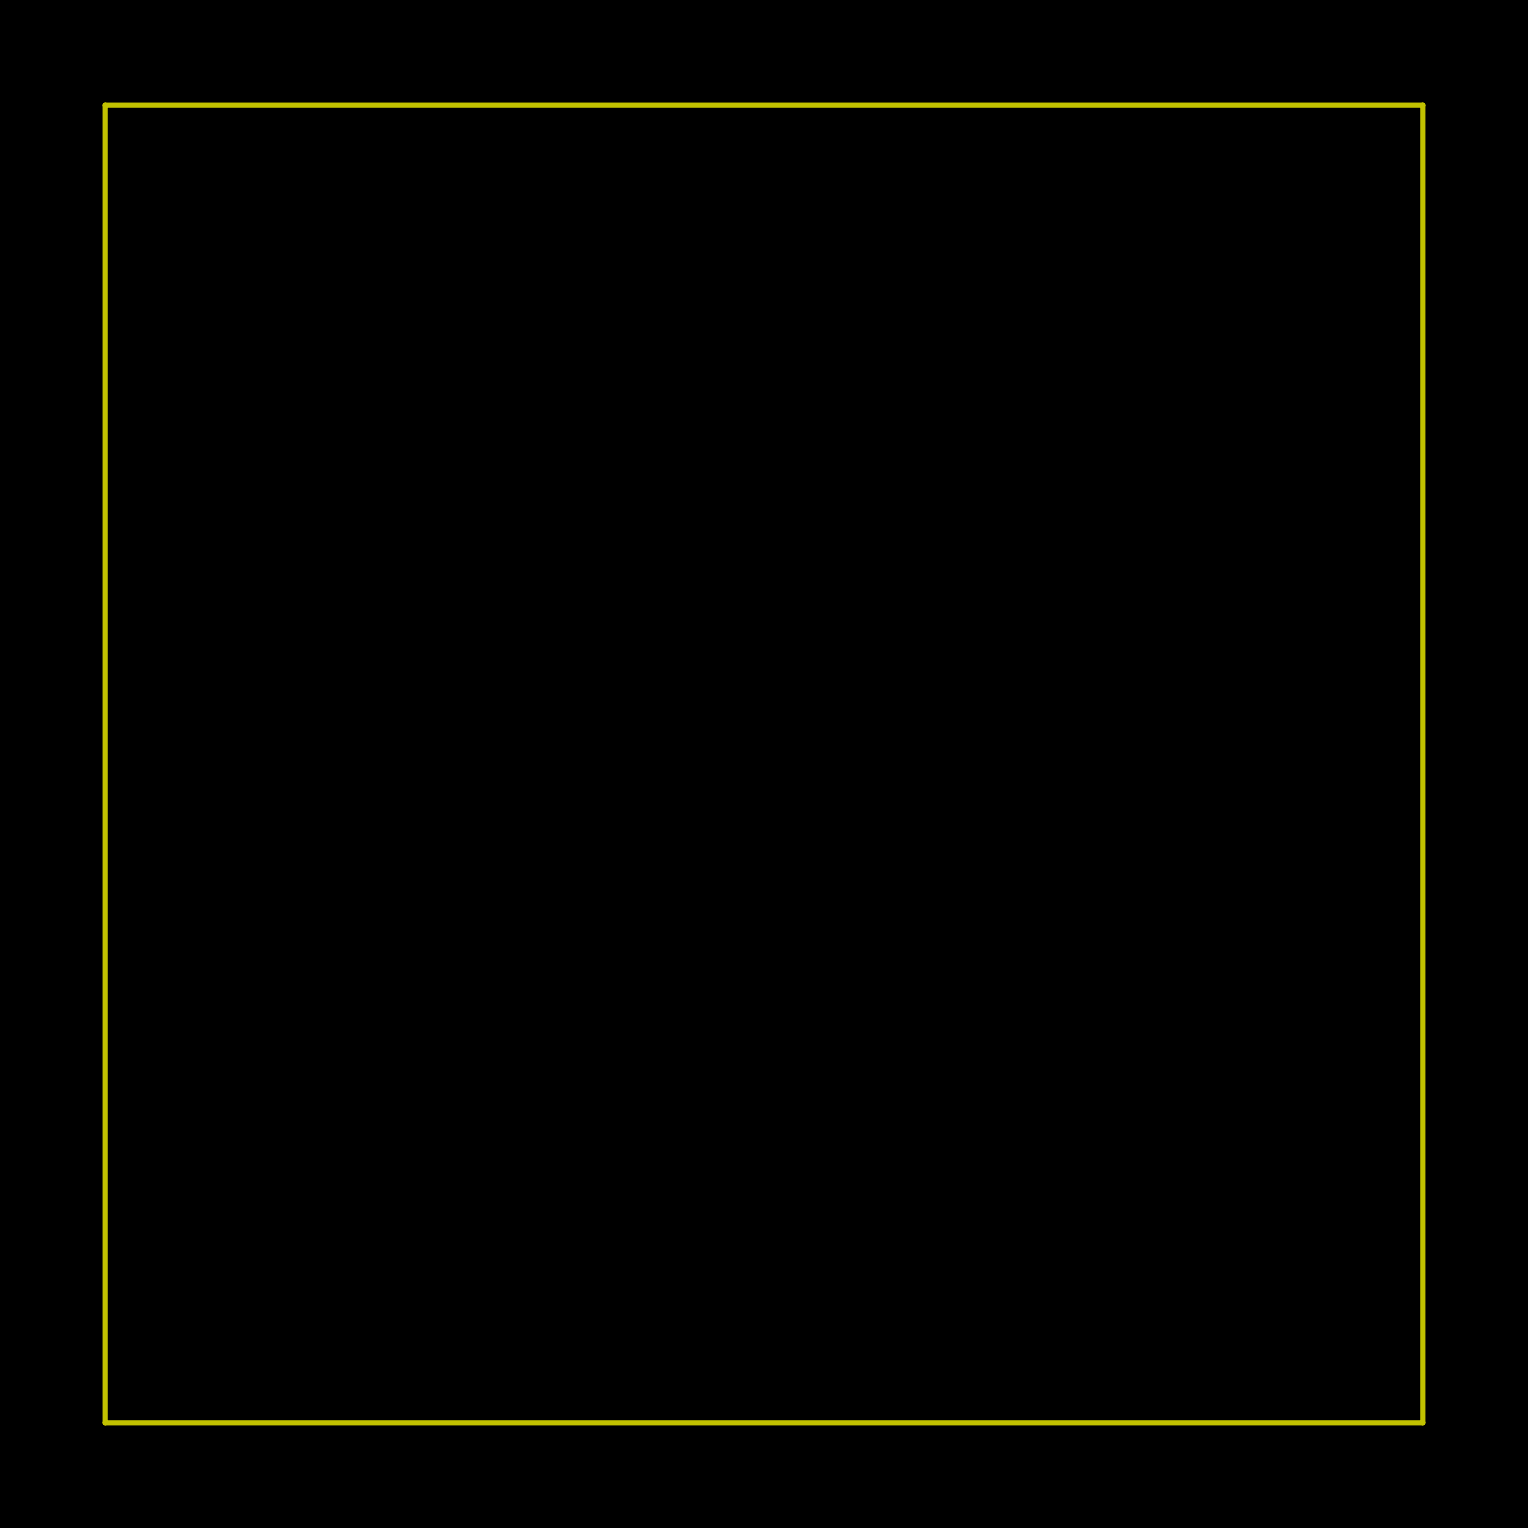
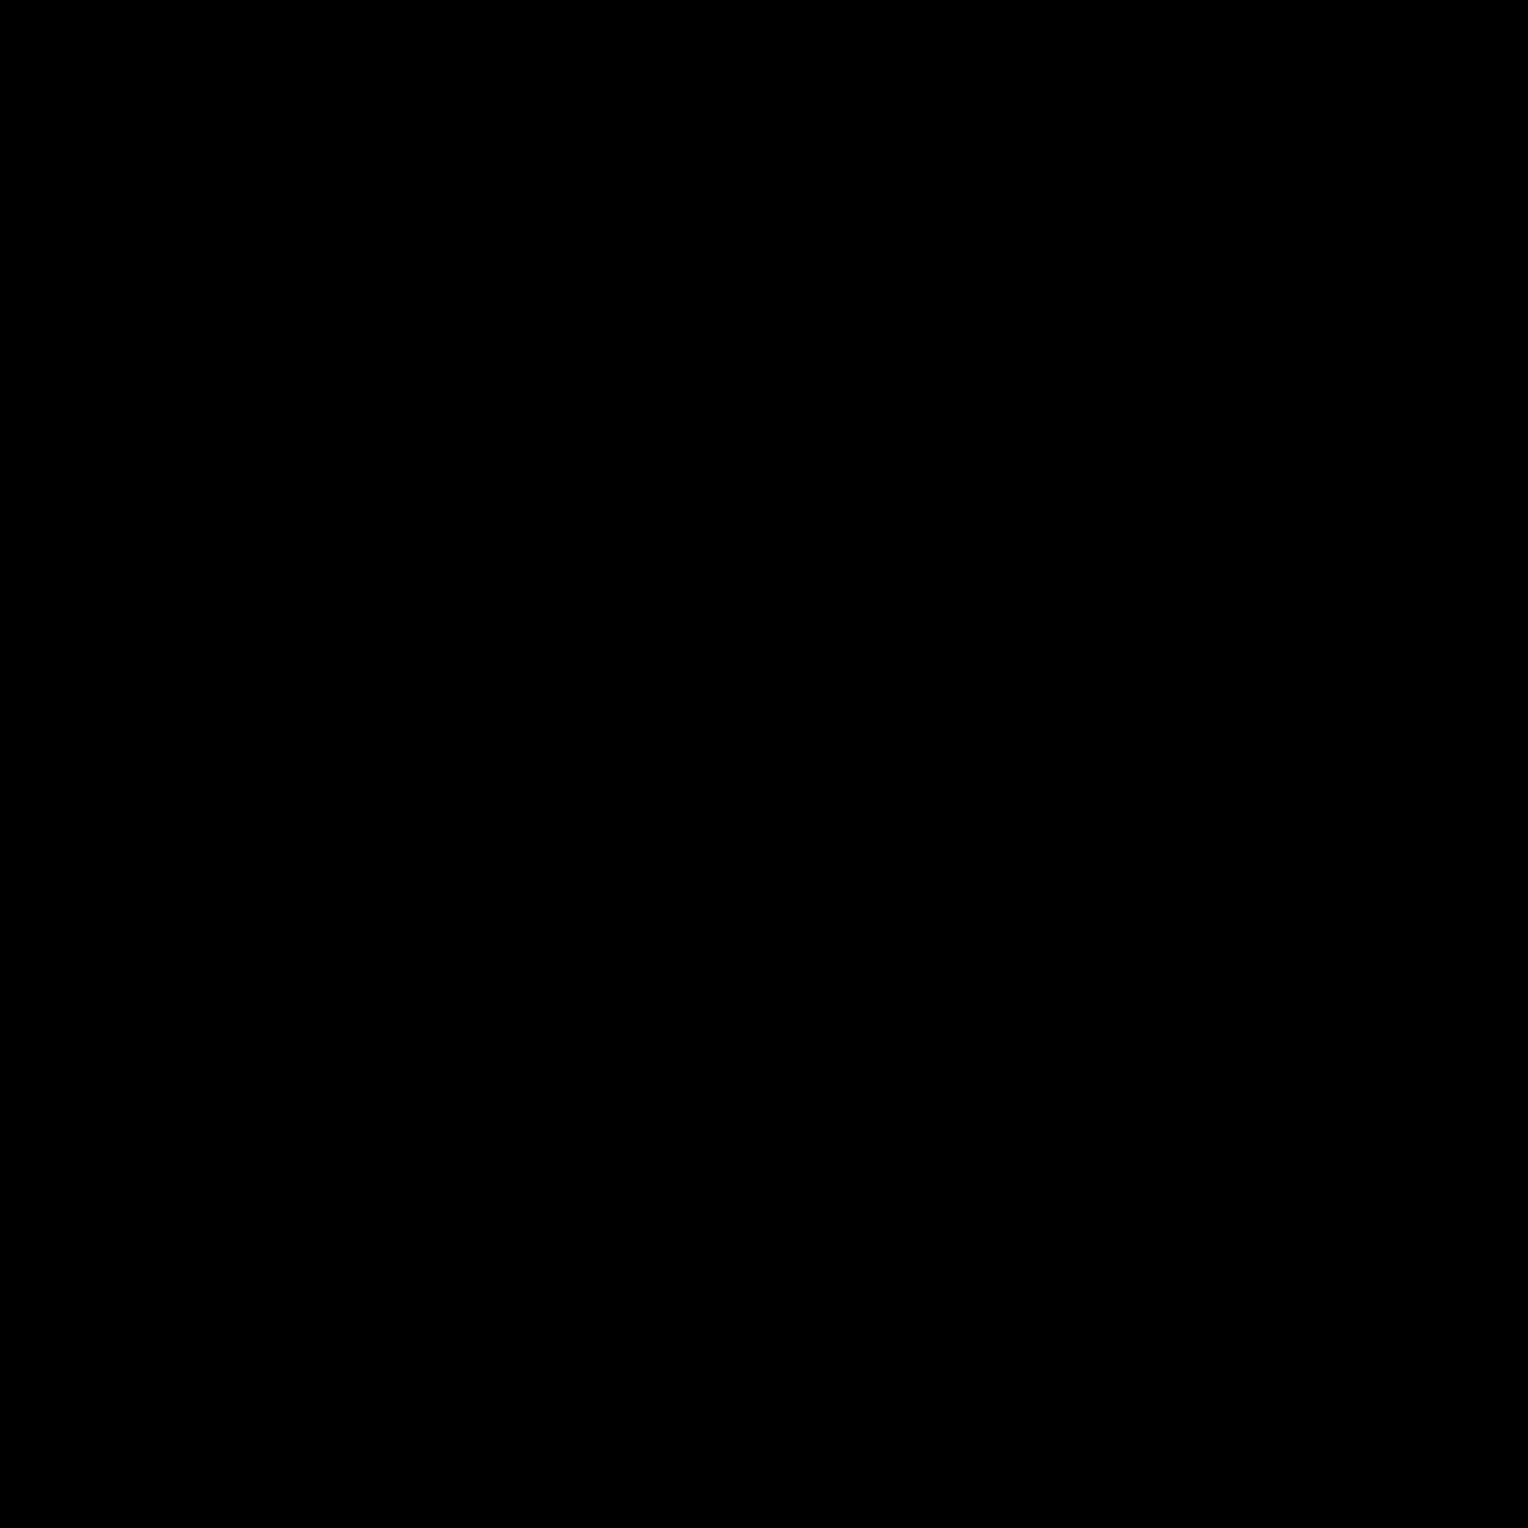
board edge: (1422, 105) (105, 105) (105, 1422) (1422, 1422) (1422, 105) -> none

